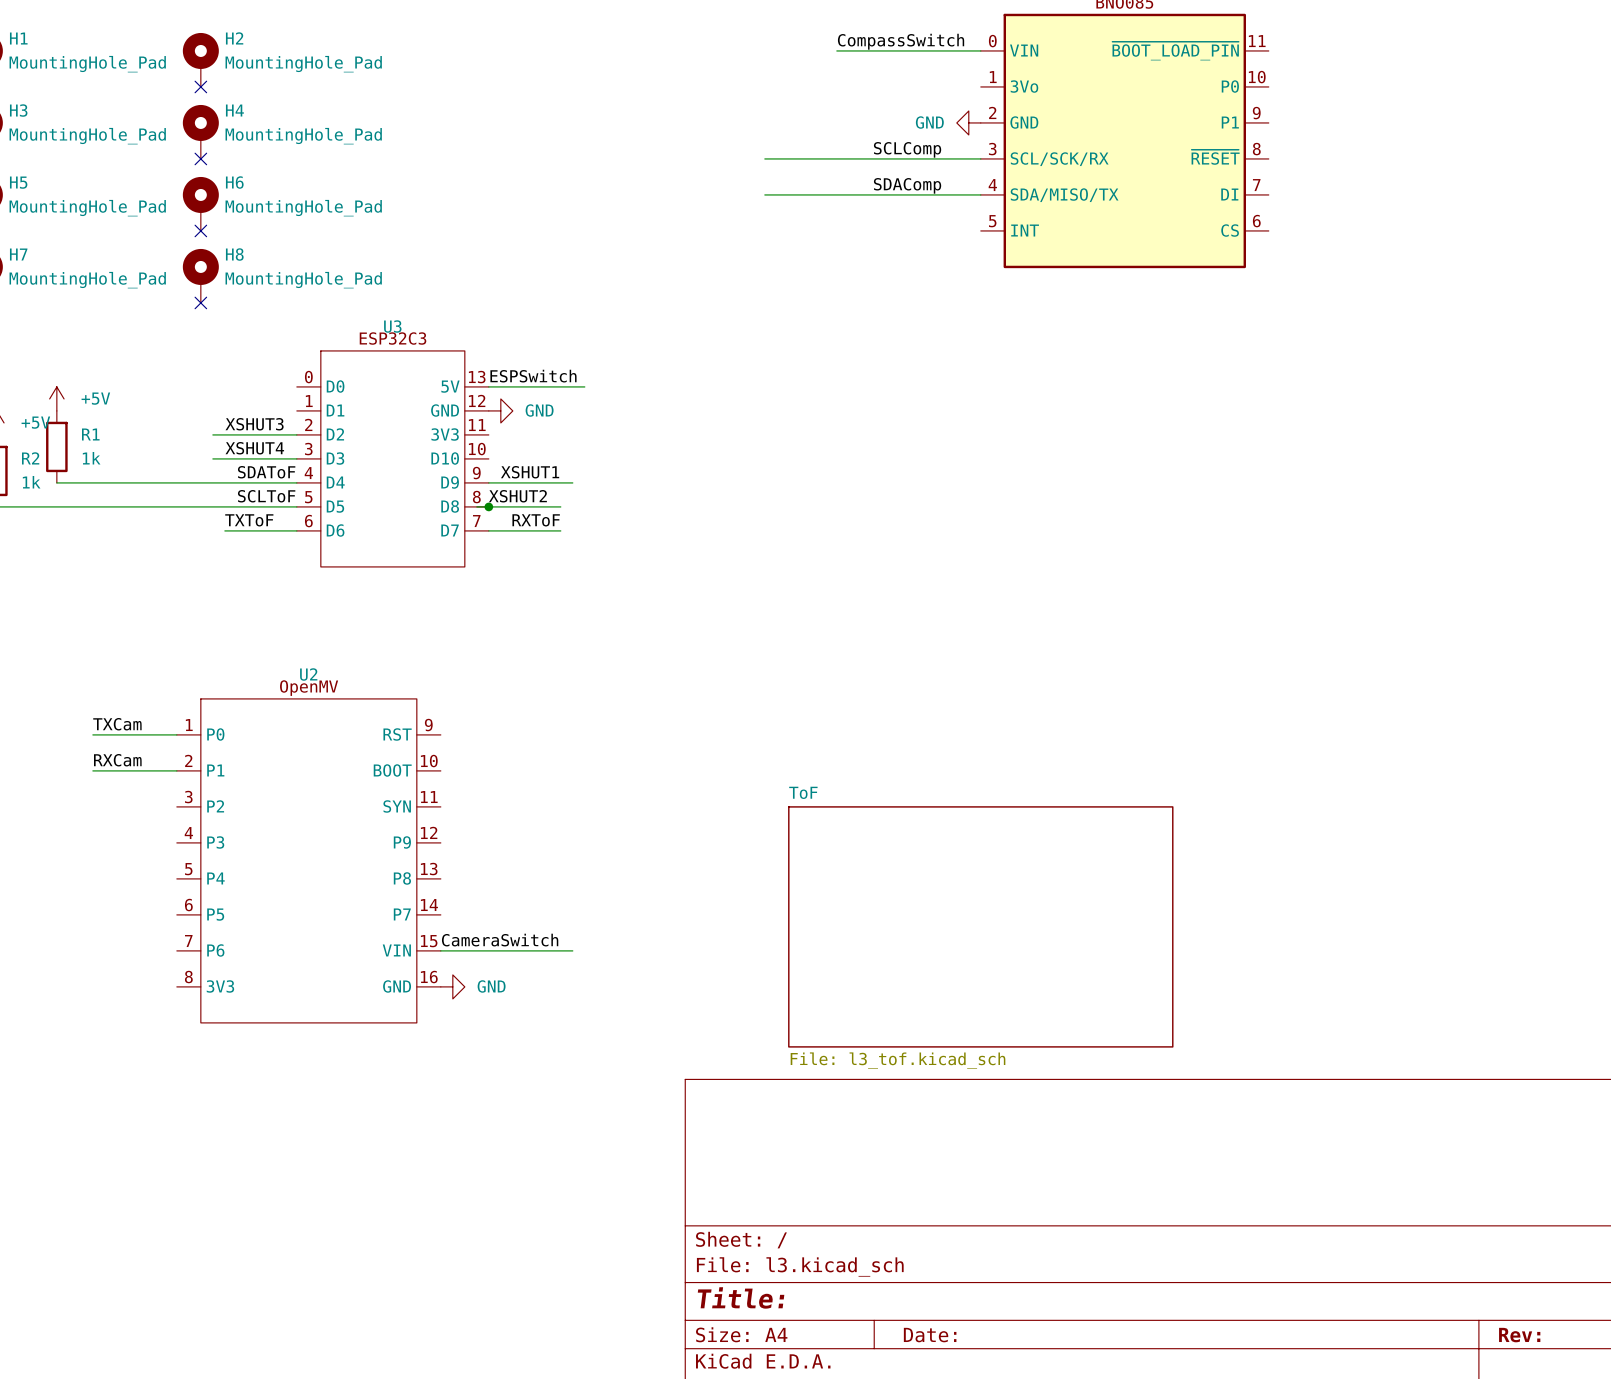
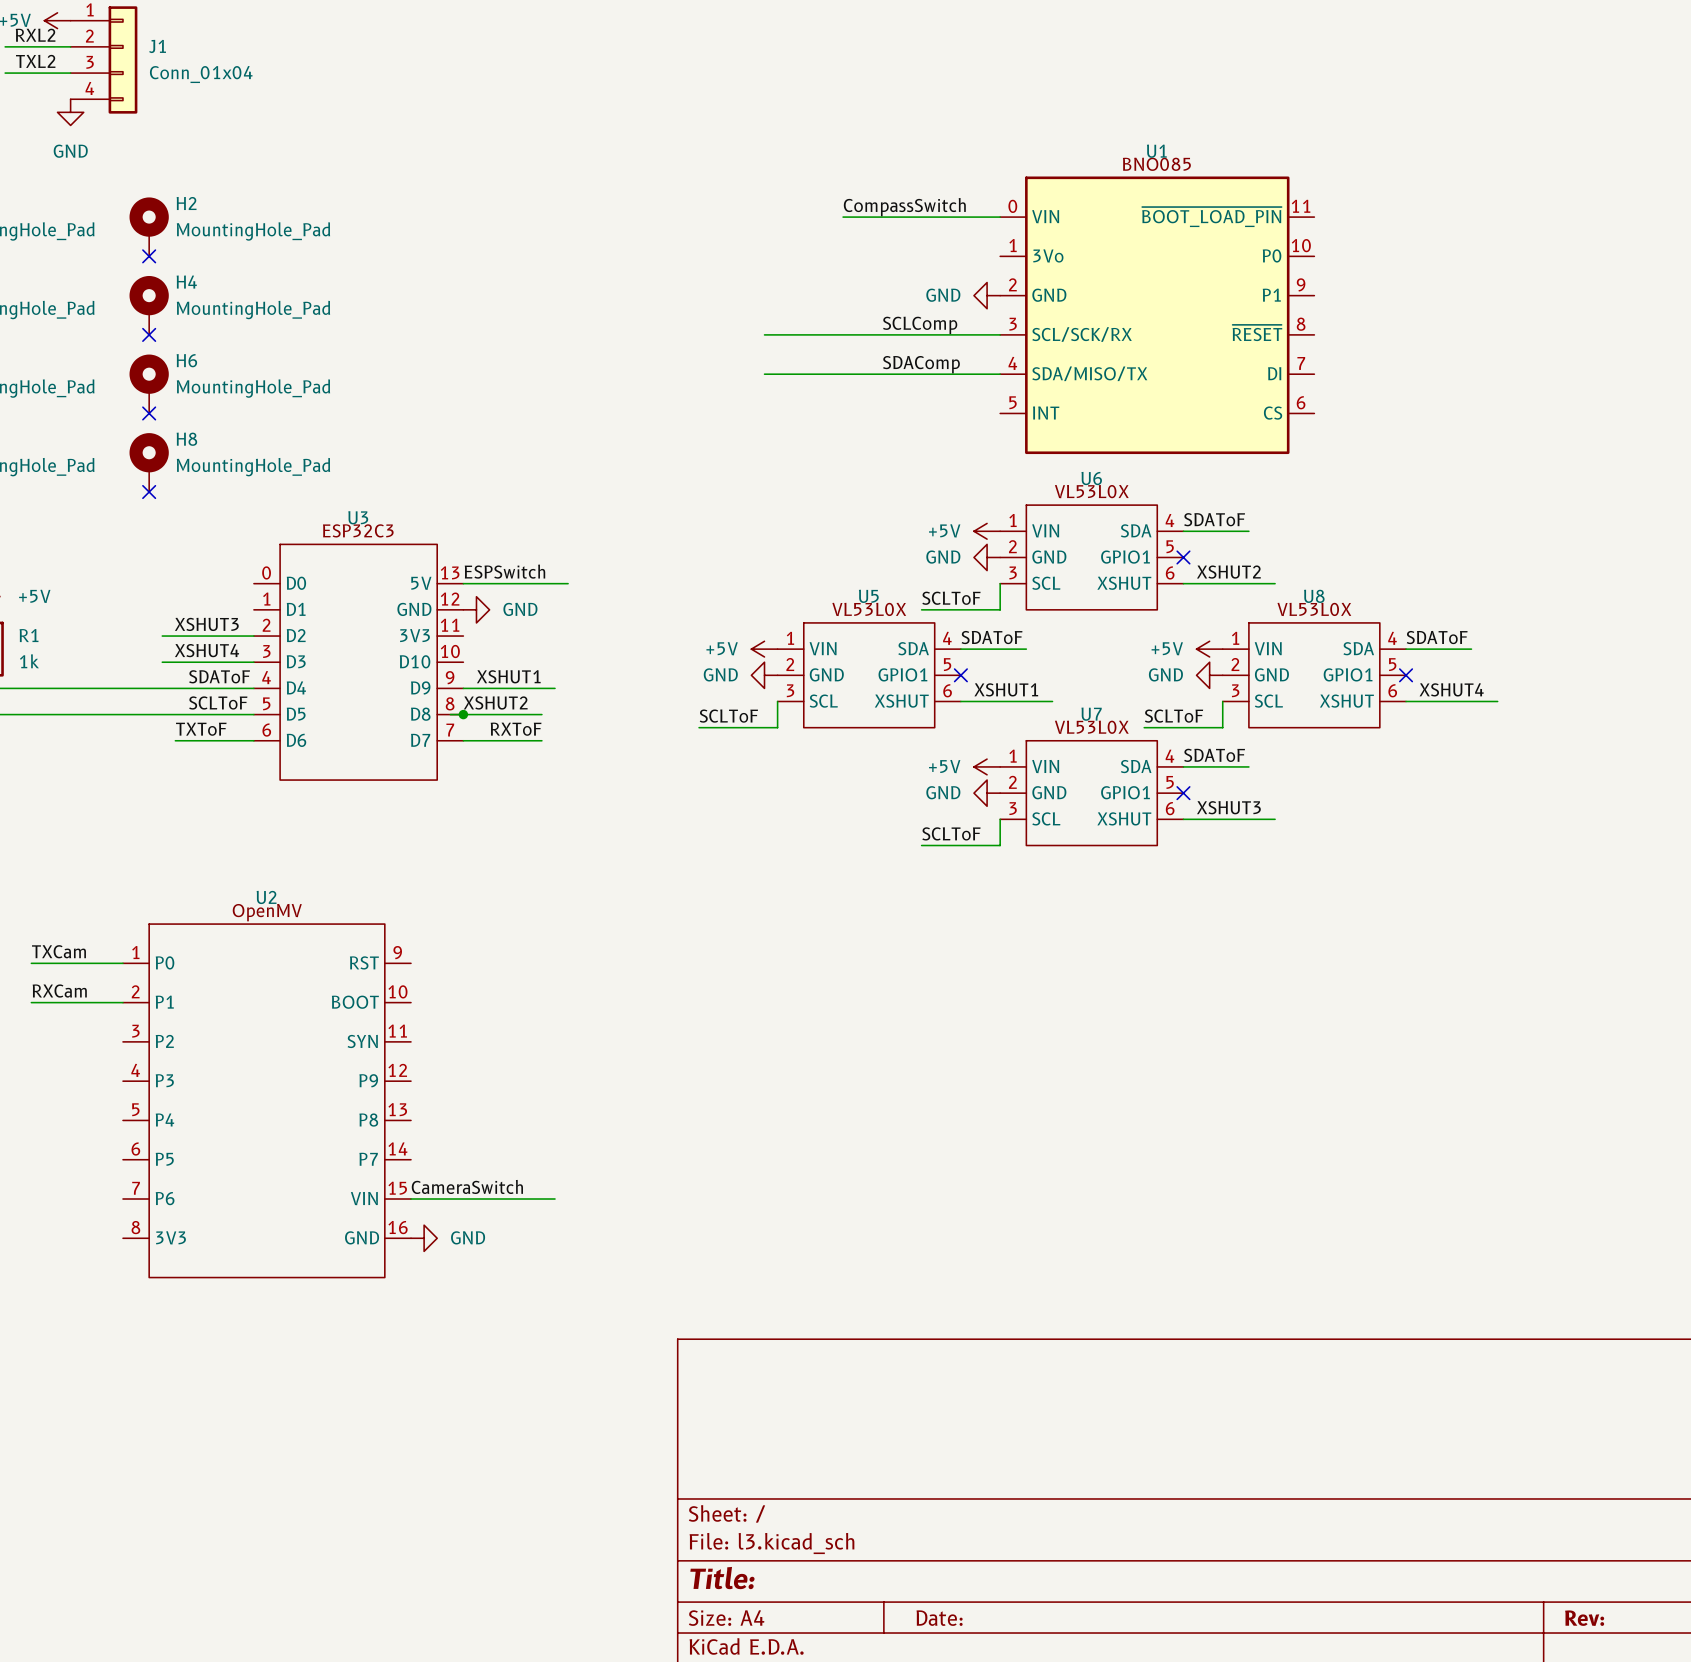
label: none -> SDAToF (1214, 519)
power symbol: none -> +5V (987, 531)
wire: none -> (1183, 531) (1248, 531)
power symbol: none -> GND (987, 557)
U6: none -> (1091, 557)
no-connect mark: none -> (1183, 557)
label: none -> XSHUT2 (1228, 572)
wire: none -> (1000, 583) (1000, 609) (921, 609)
wire: none -> (1183, 583) (1275, 583)
label: none -> SCLToF (951, 598)
label: none -> SDAToF (992, 637)
label: none -> SDAToF (1437, 637)
power symbol: none -> +5V (764, 649)
wire: none -> (960, 649) (1026, 649)
power symbol: none -> +5V (1209, 649)
wire: none -> (1406, 649) (1471, 649)
power symbol: none -> GND (764, 675)
U5: none -> (869, 675)
no-connect mark: none -> (960, 675)
power symbol: none -> GND (1209, 675)
U8: none -> (1314, 675)
no-connect mark: none -> (1406, 675)
label: none -> XSHUT1 (1006, 689)
label: none -> XSHUT4 (1451, 689)
wire: none -> (777, 701) (777, 727) (699, 727)
wire: none -> (960, 701) (1052, 701)
wire: none -> (1222, 701) (1222, 727) (1144, 727)
wire: none -> (1406, 701) (1497, 701)
label: none -> SCLToF (728, 716)
label: none -> SCLToF (1174, 716)
label: none -> SDAToF (1214, 755)
power symbol: none -> +5V (987, 766)
wire: none -> (1183, 766) (1248, 766)
power symbol: none -> GND (987, 793)
U7: none -> (1091, 793)
no-connect mark: none -> (1183, 793)
label: none -> XSHUT3 (1228, 807)
wire: none -> (1000, 819) (1000, 845) (921, 845)
wire: none -> (1183, 819) (1275, 819)
label: none -> SCLToF (951, 833)
sheet ToF: File: l3_tof.kicad_sch (980, 926) -> none

